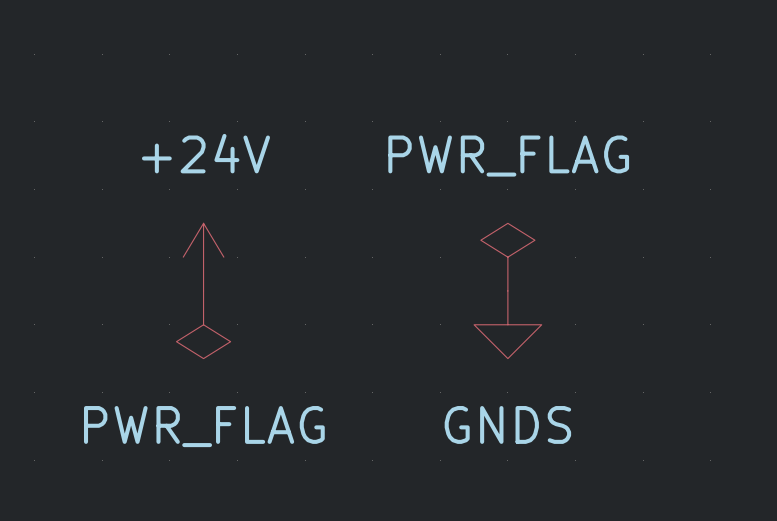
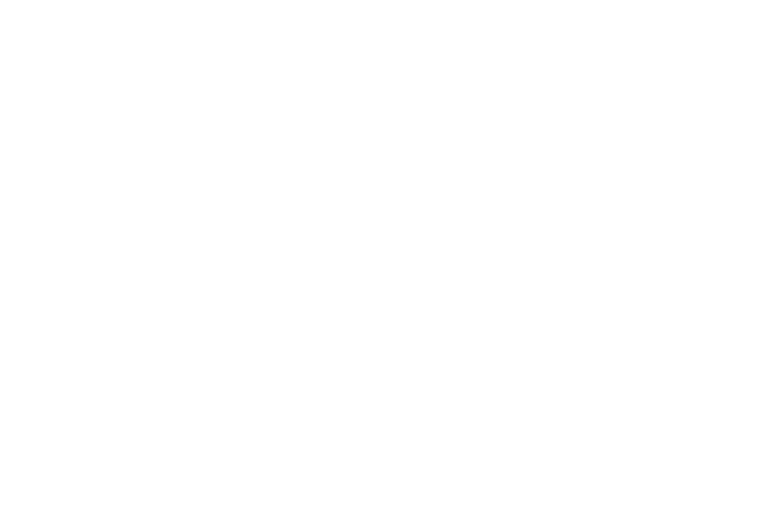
power symbol: +24V (203, 257) -> none
power symbol: PWR_FLAG (507, 257) -> none
power symbol: PWR_FLAG (203, 324) -> none
power symbol: GNDS (507, 324) -> none

